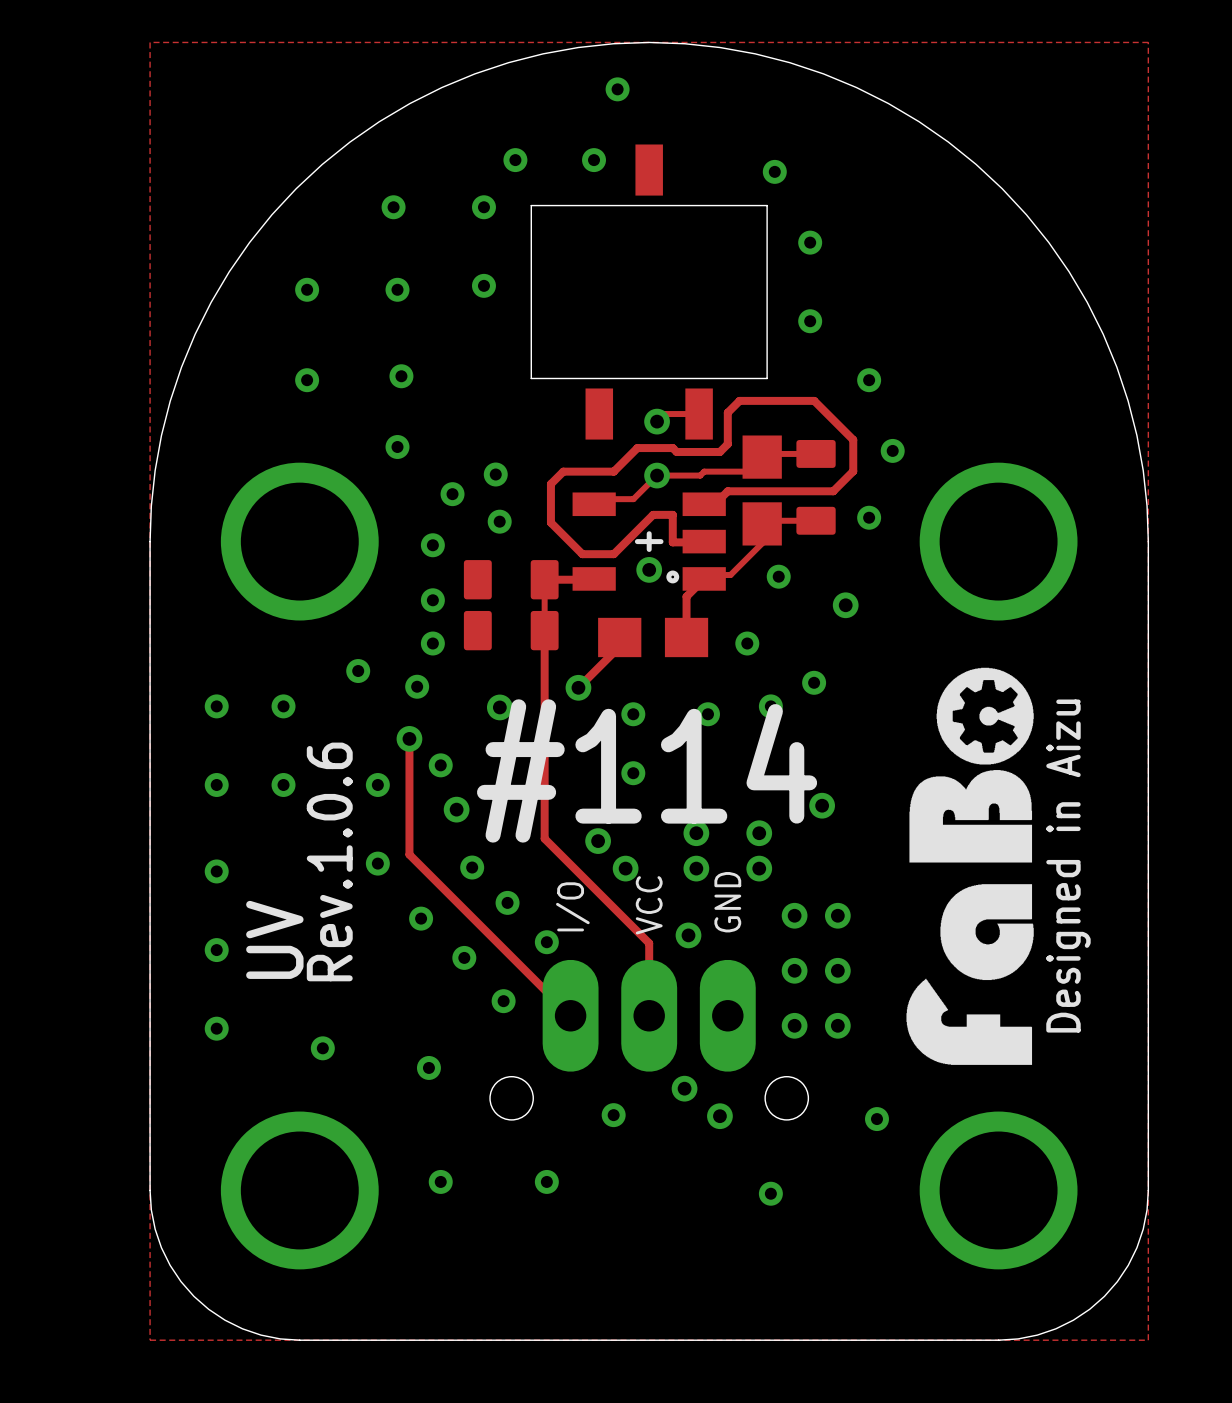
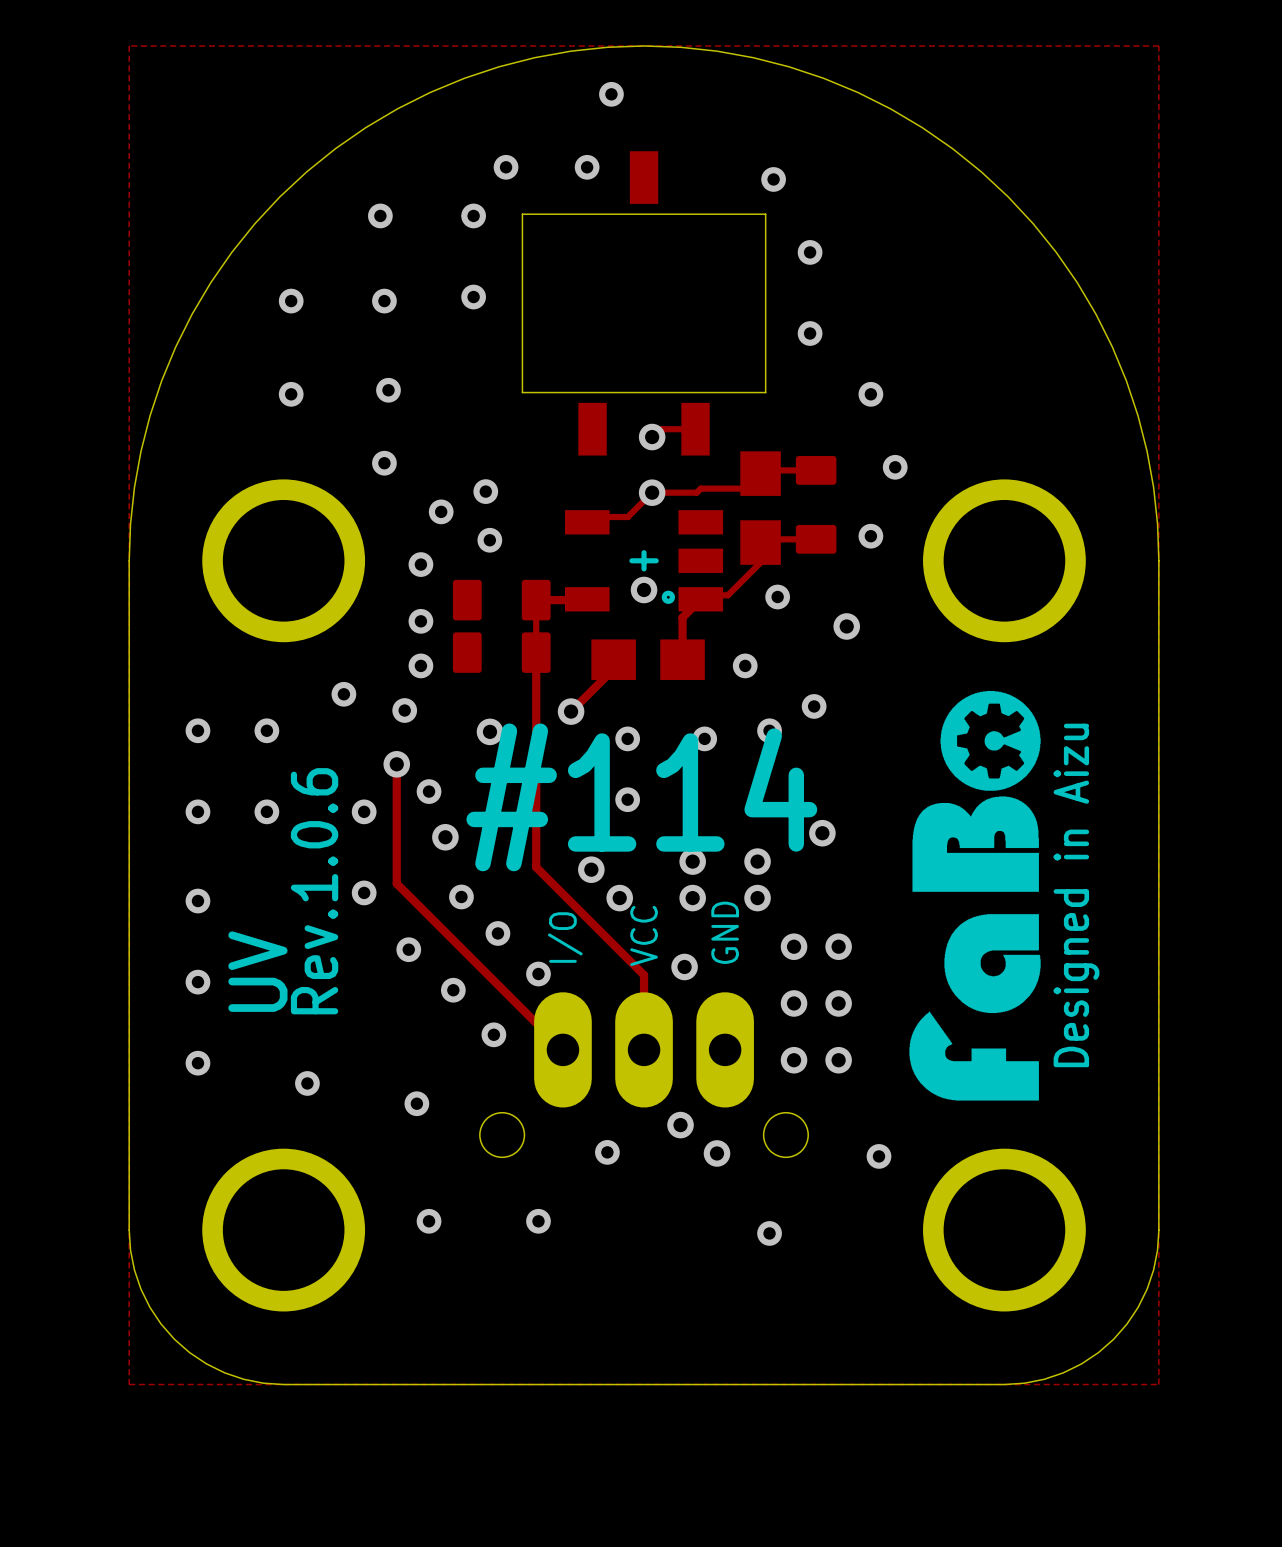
track: (704, 504) (714, 504) (727, 491) (833, 491) (853, 471) (853, 439) (814, 400) (739, 400) (727, 412) (727, 444) (719, 451) (676, 451) (672, 448) (637, 448) (613, 471) (563, 471) (550, 484) (550, 522) (582, 554) (613, 554) (653, 514) (672, 514) (672, 542) (704, 541) -> none

